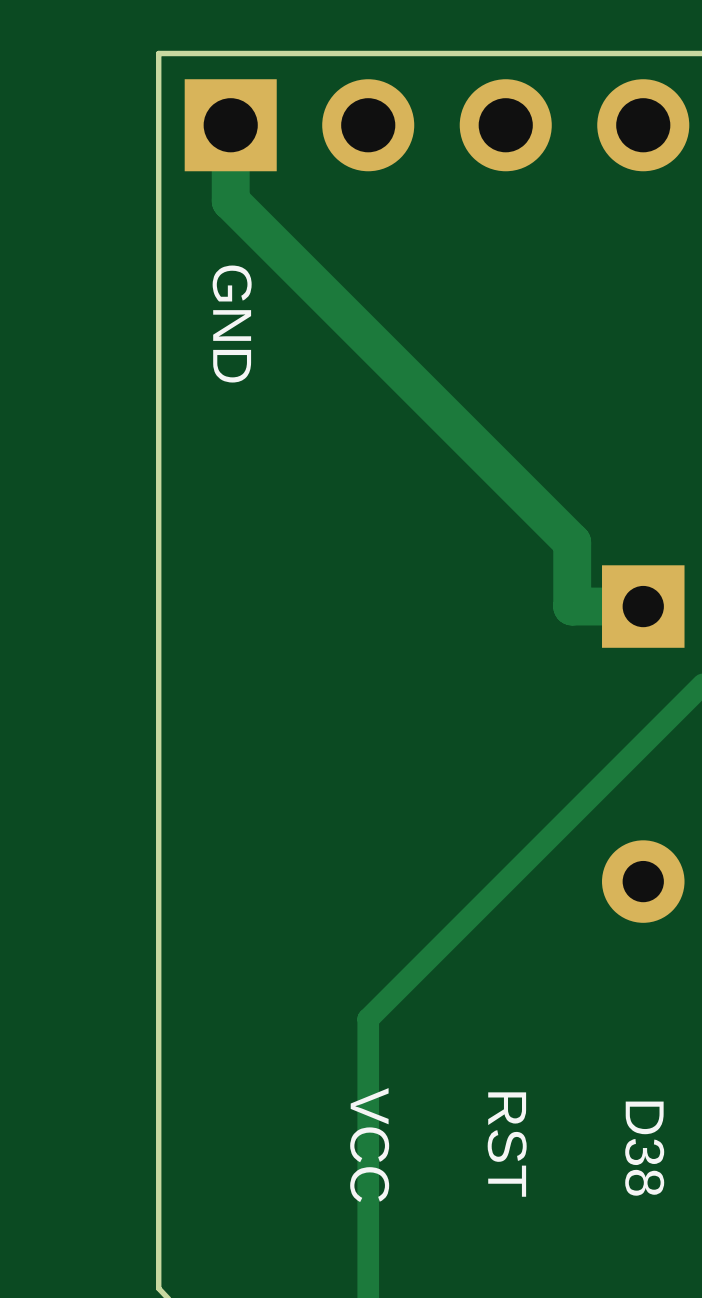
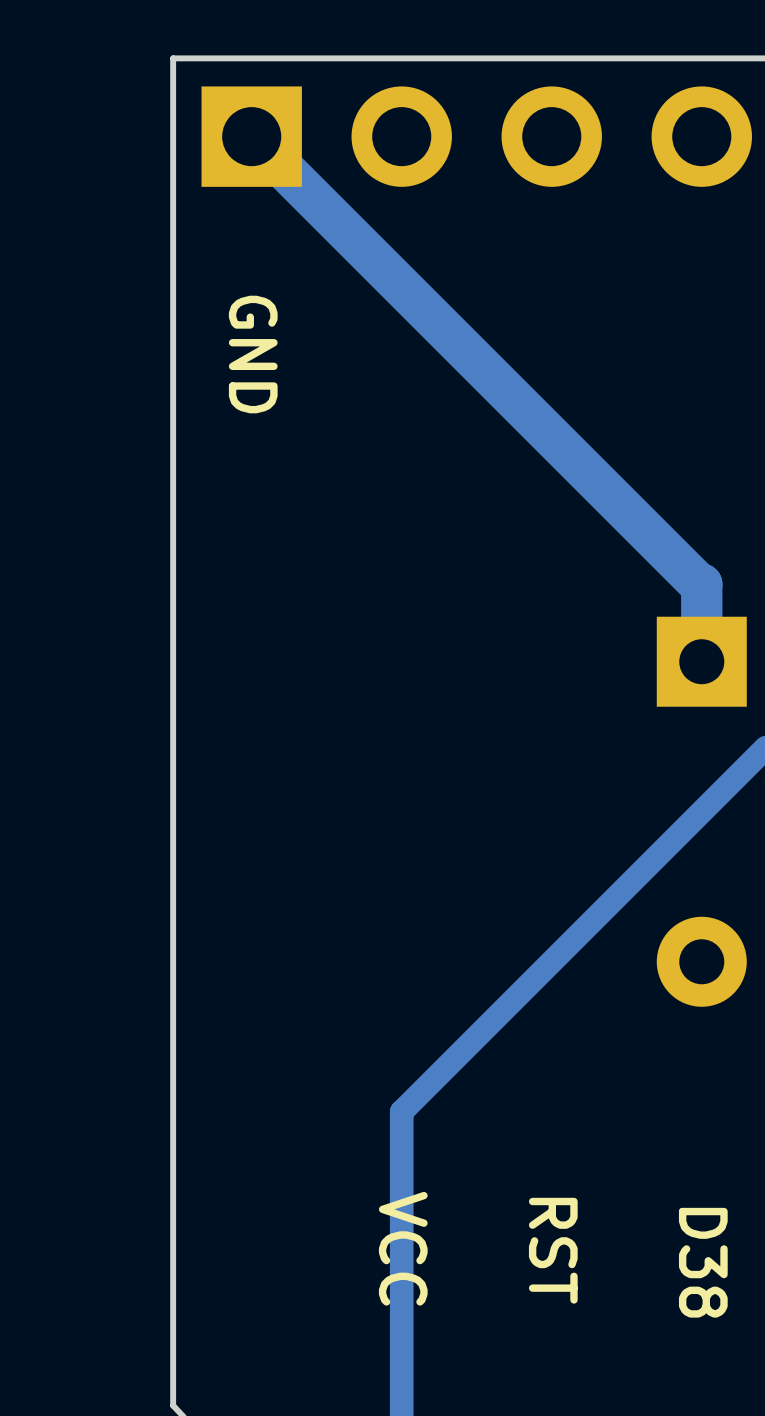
track: (230, 125) (230, 201) (572, 542) (572, 606) (643, 606) -> (251, 136) (699, 584) (701, 584) (701, 661)

